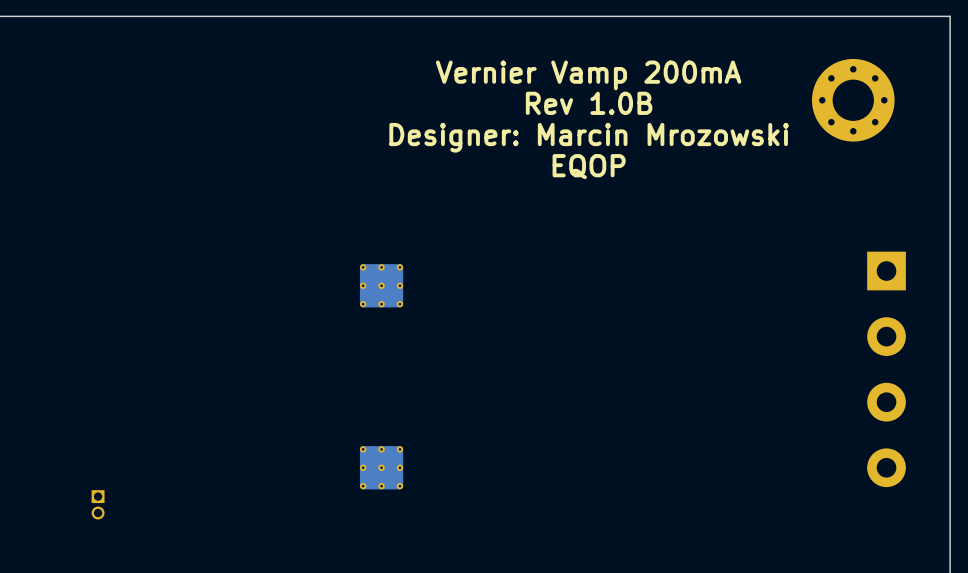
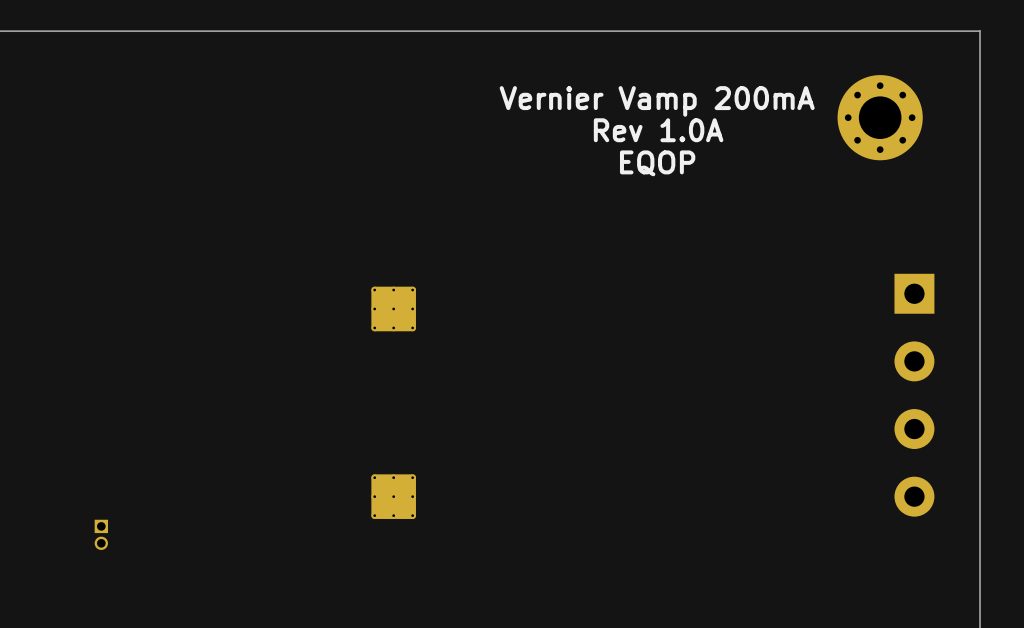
text position: Vernier Vamp 200mA (588, 75) -> Vernier Vamp 200mA (657, 101)
text: Rev 1.0B (589, 103) -> Rev 1.0A (658, 130)
text: Designer: Marcin Mrozowski (589, 137) -> none
text position: EQOP (589, 166) -> EQOP (657, 163)

